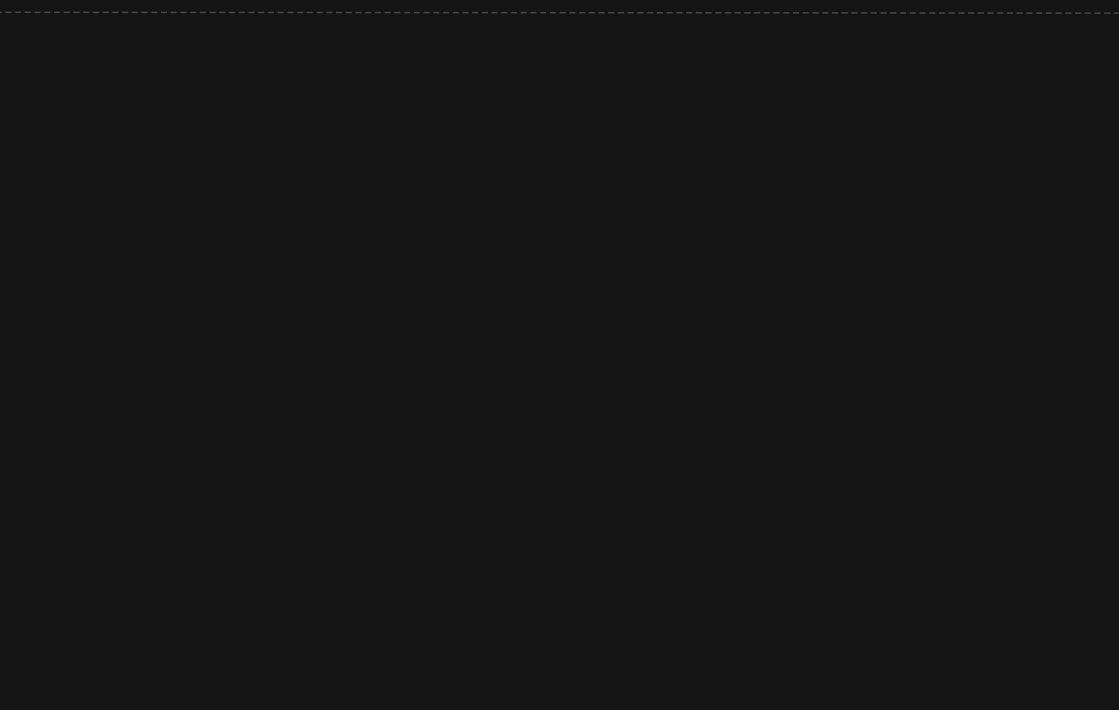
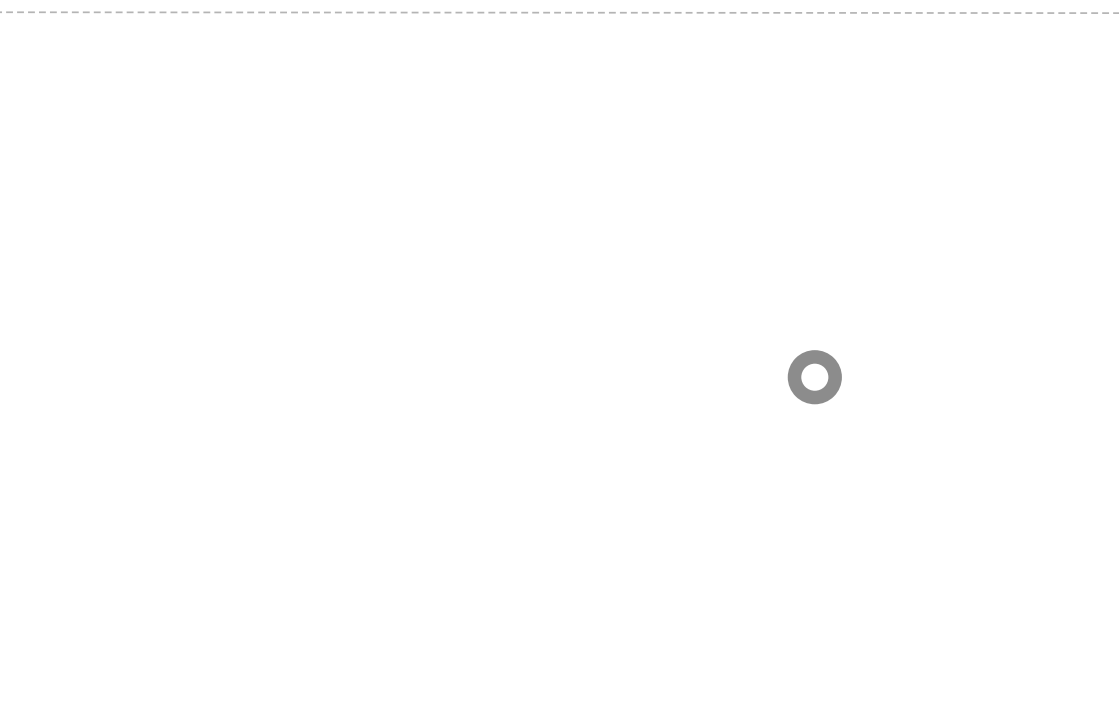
via: none -> (814, 377)

